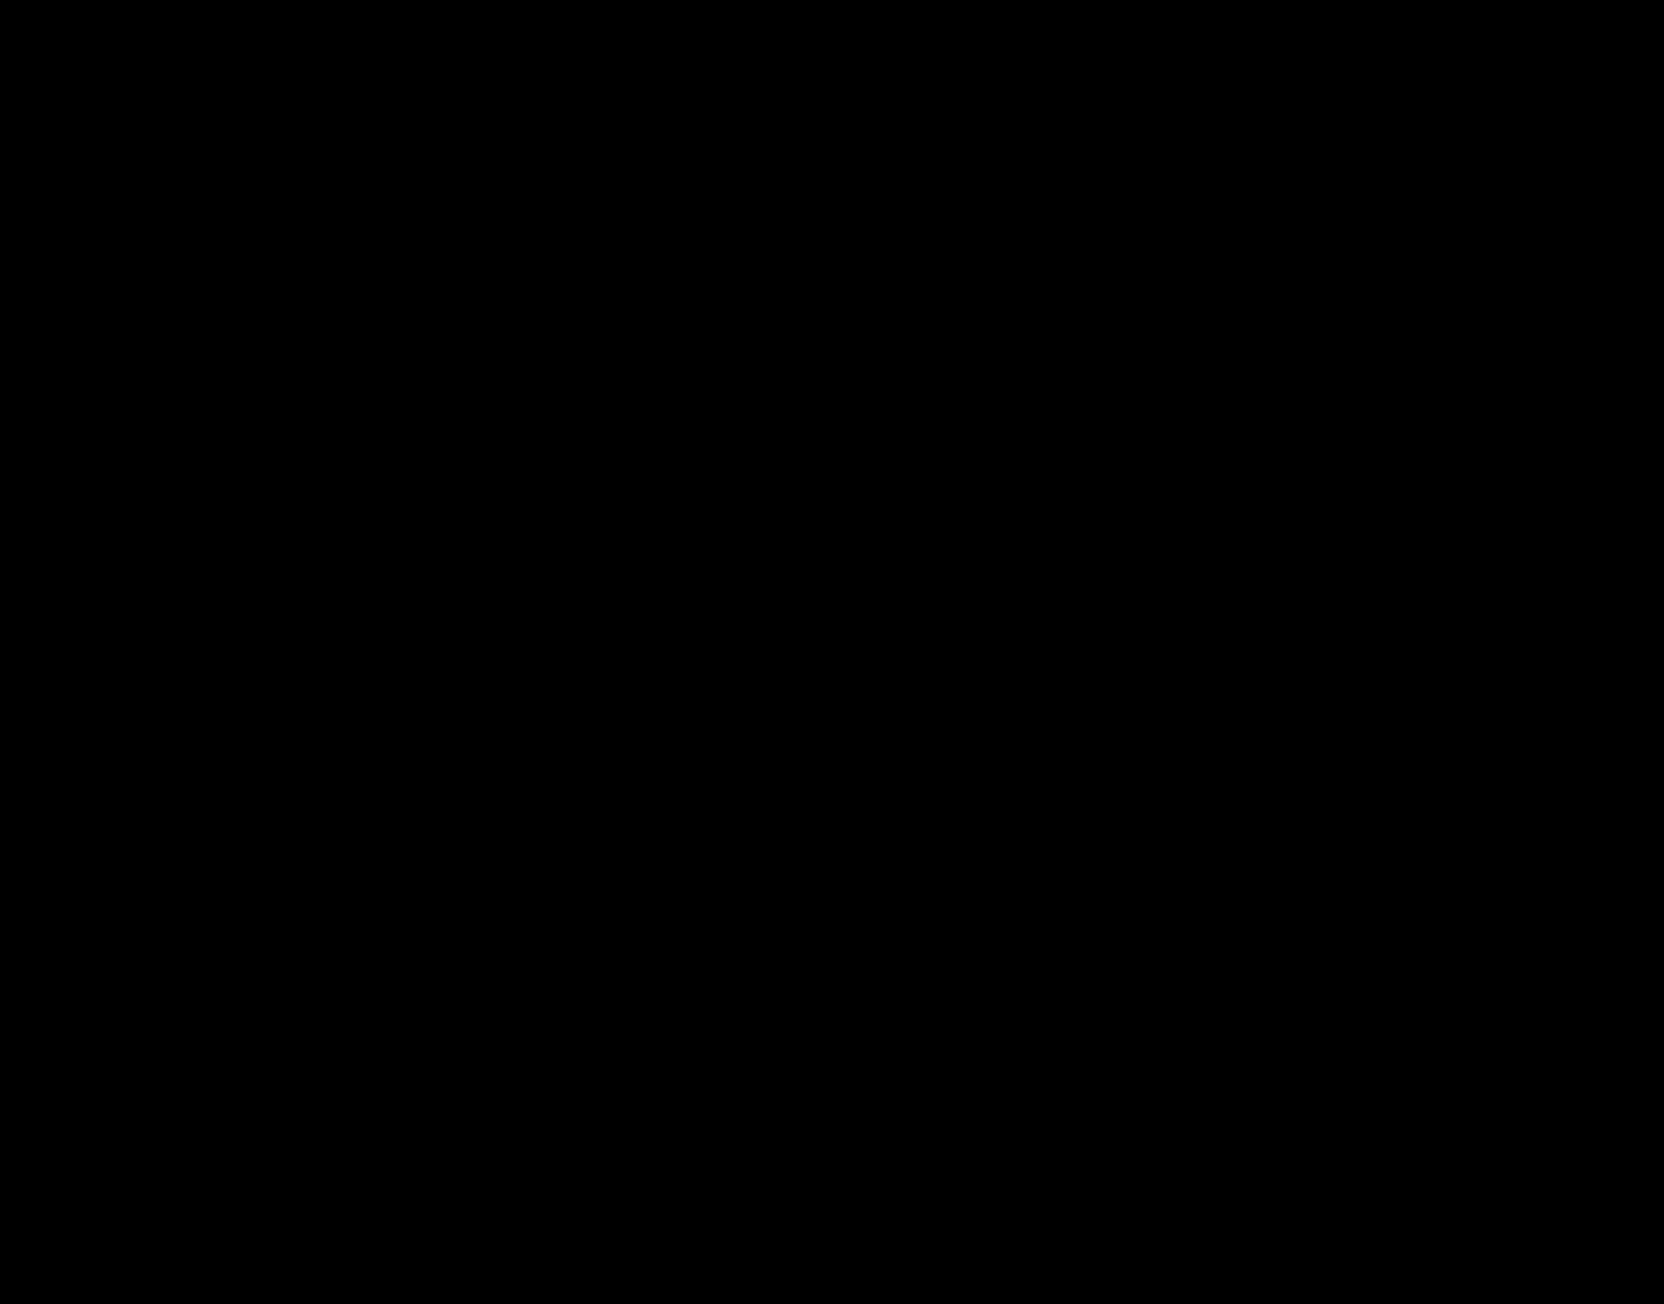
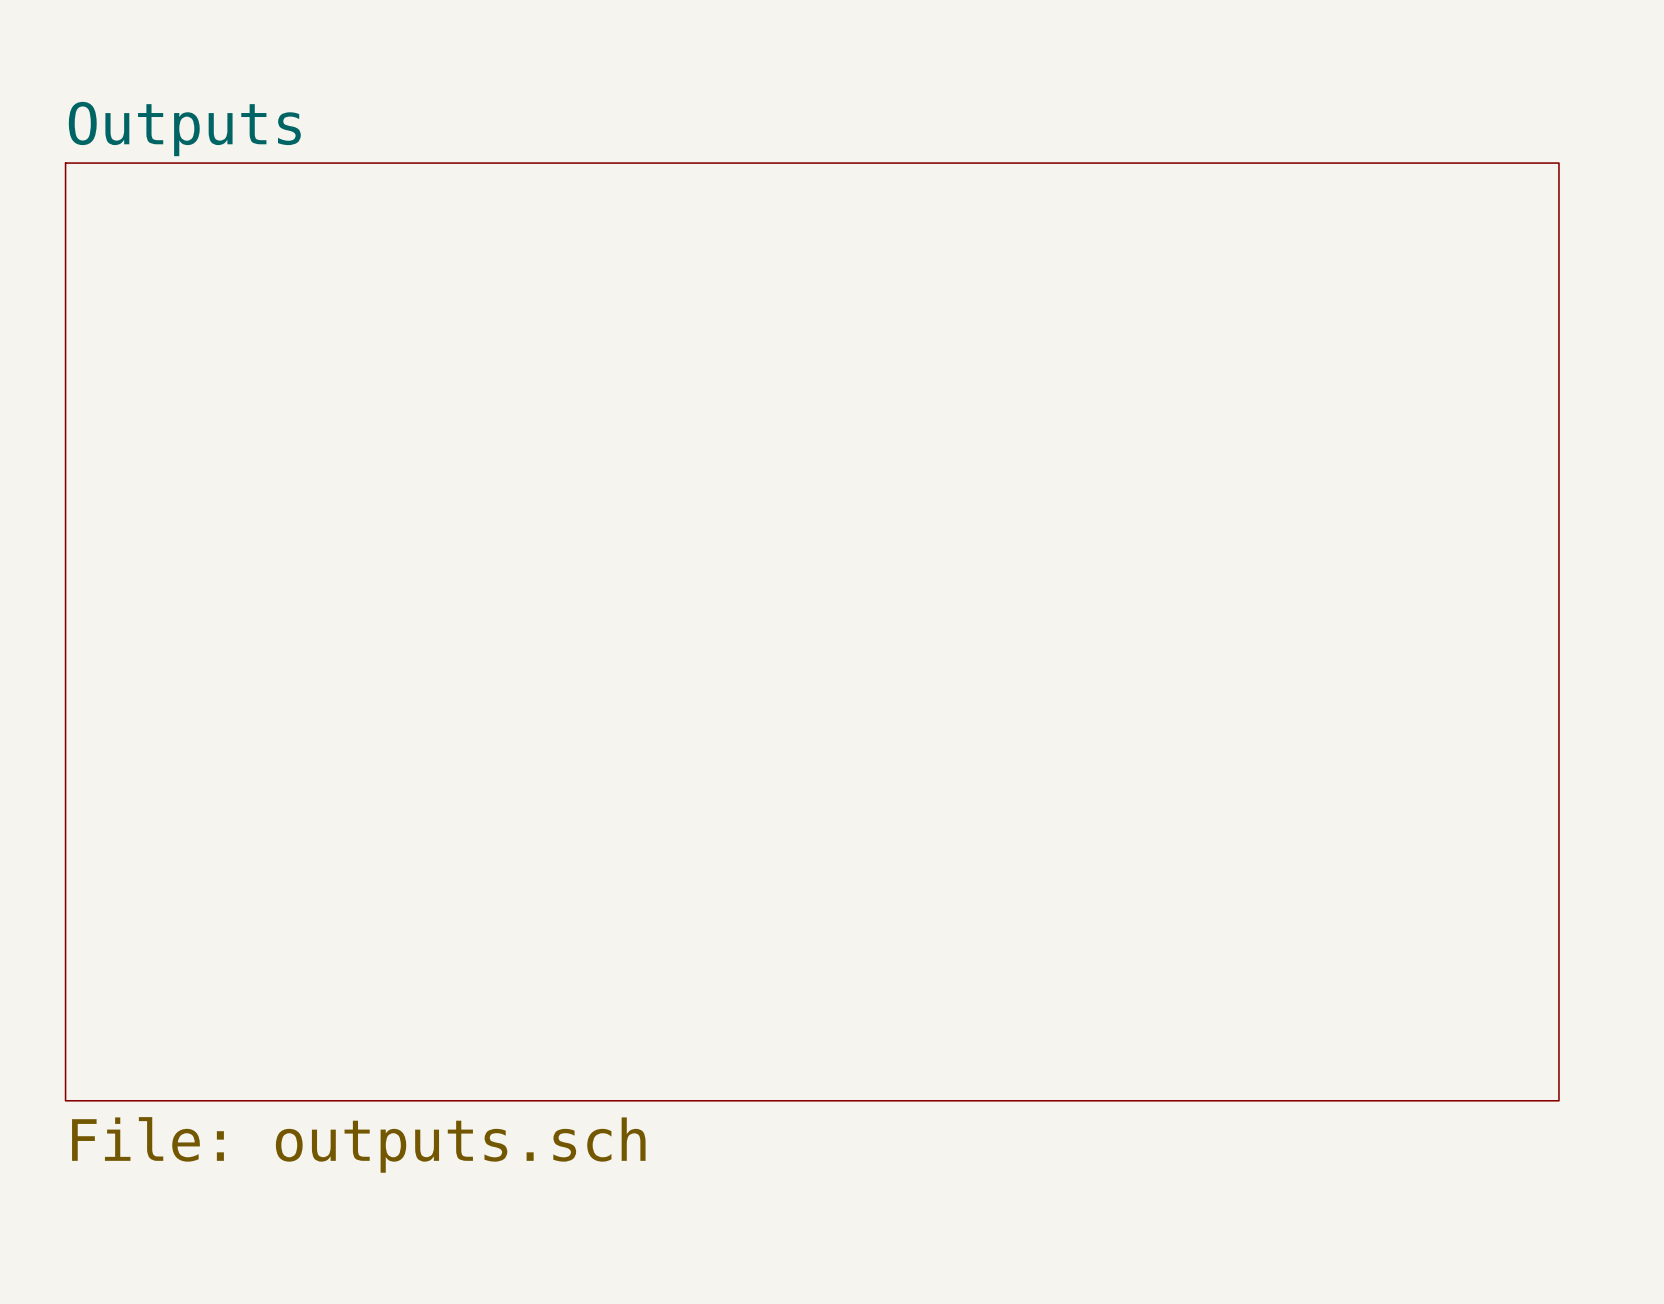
sheet Outputs: none -> File: outputs.sch (812, 631)

